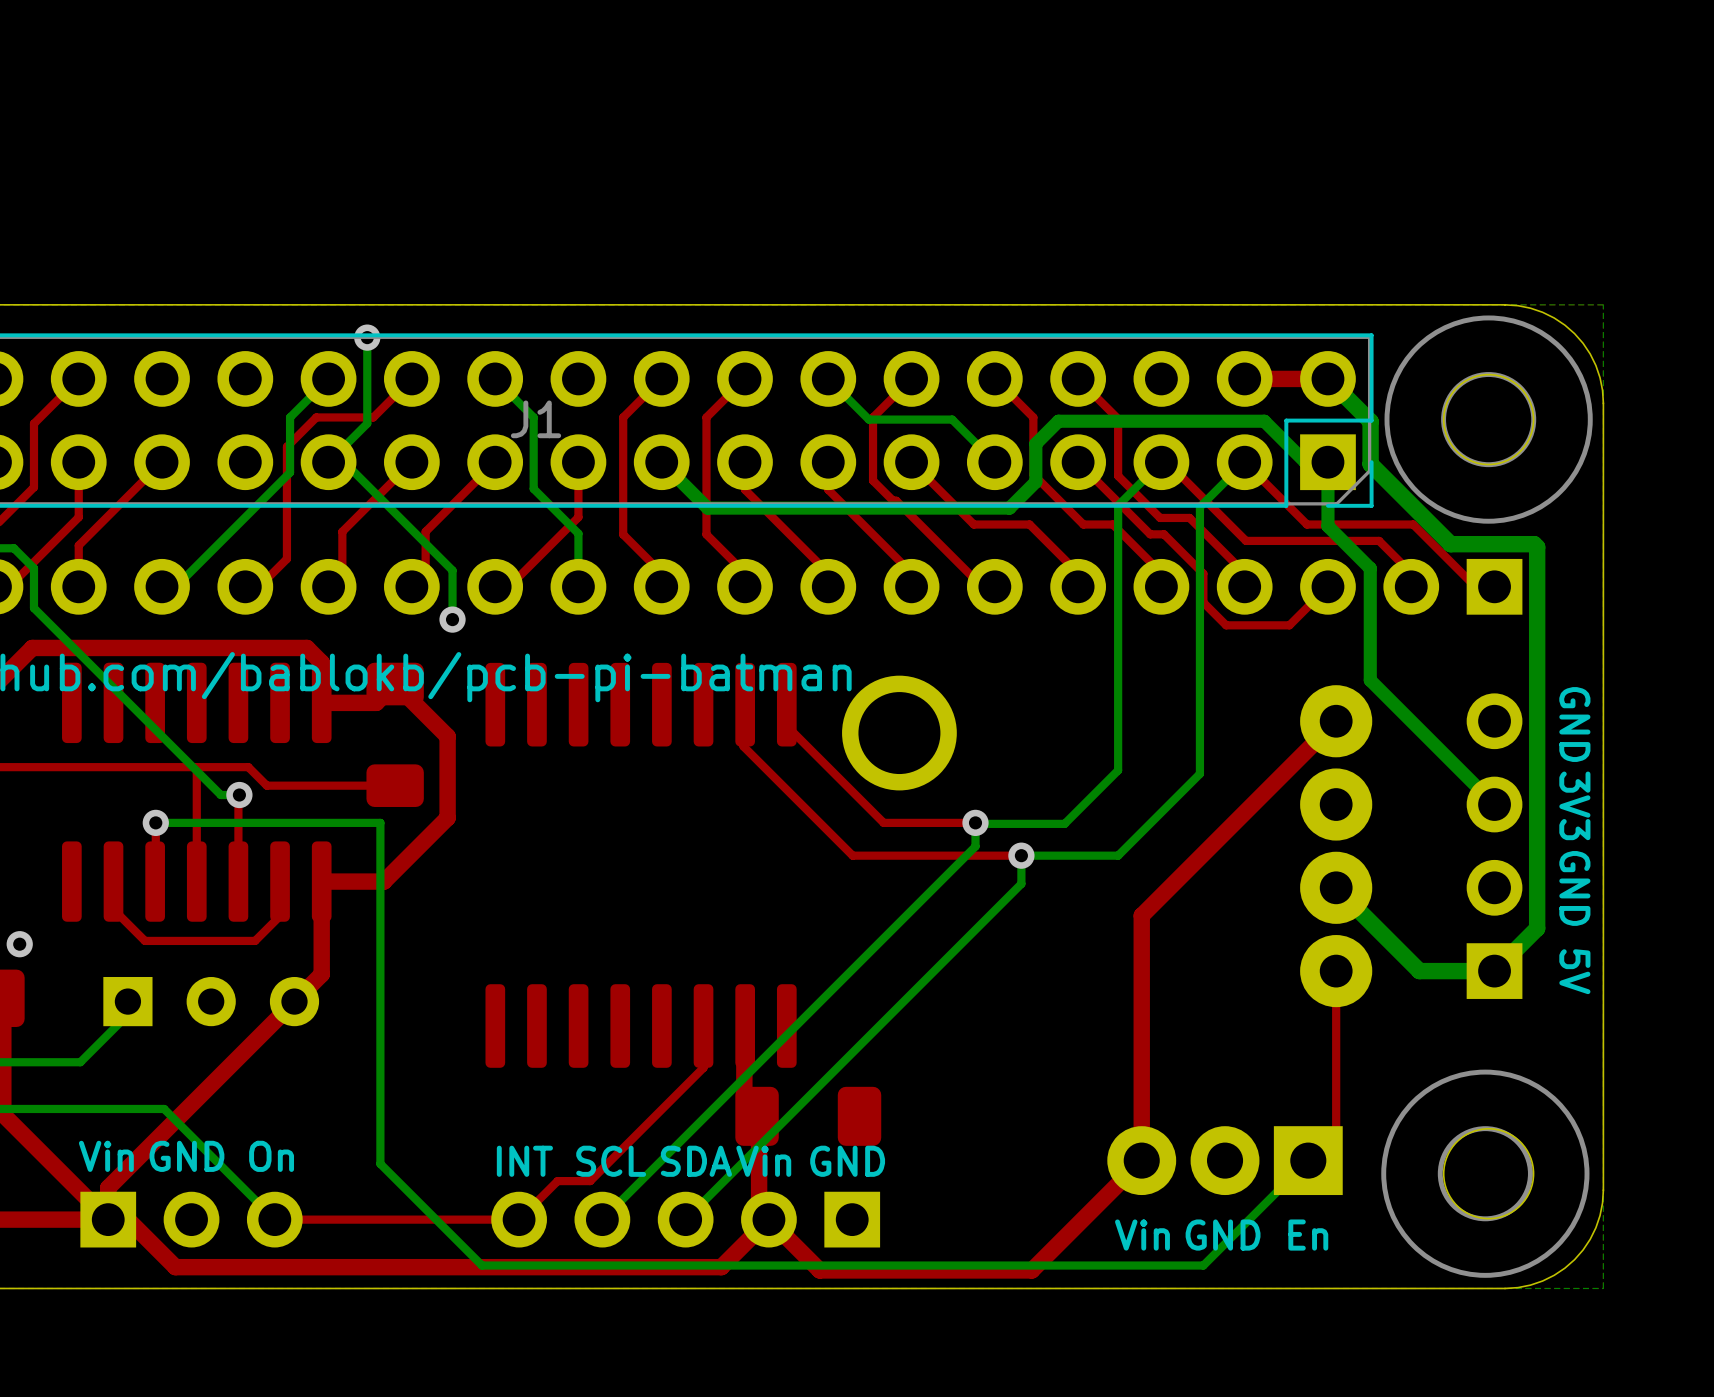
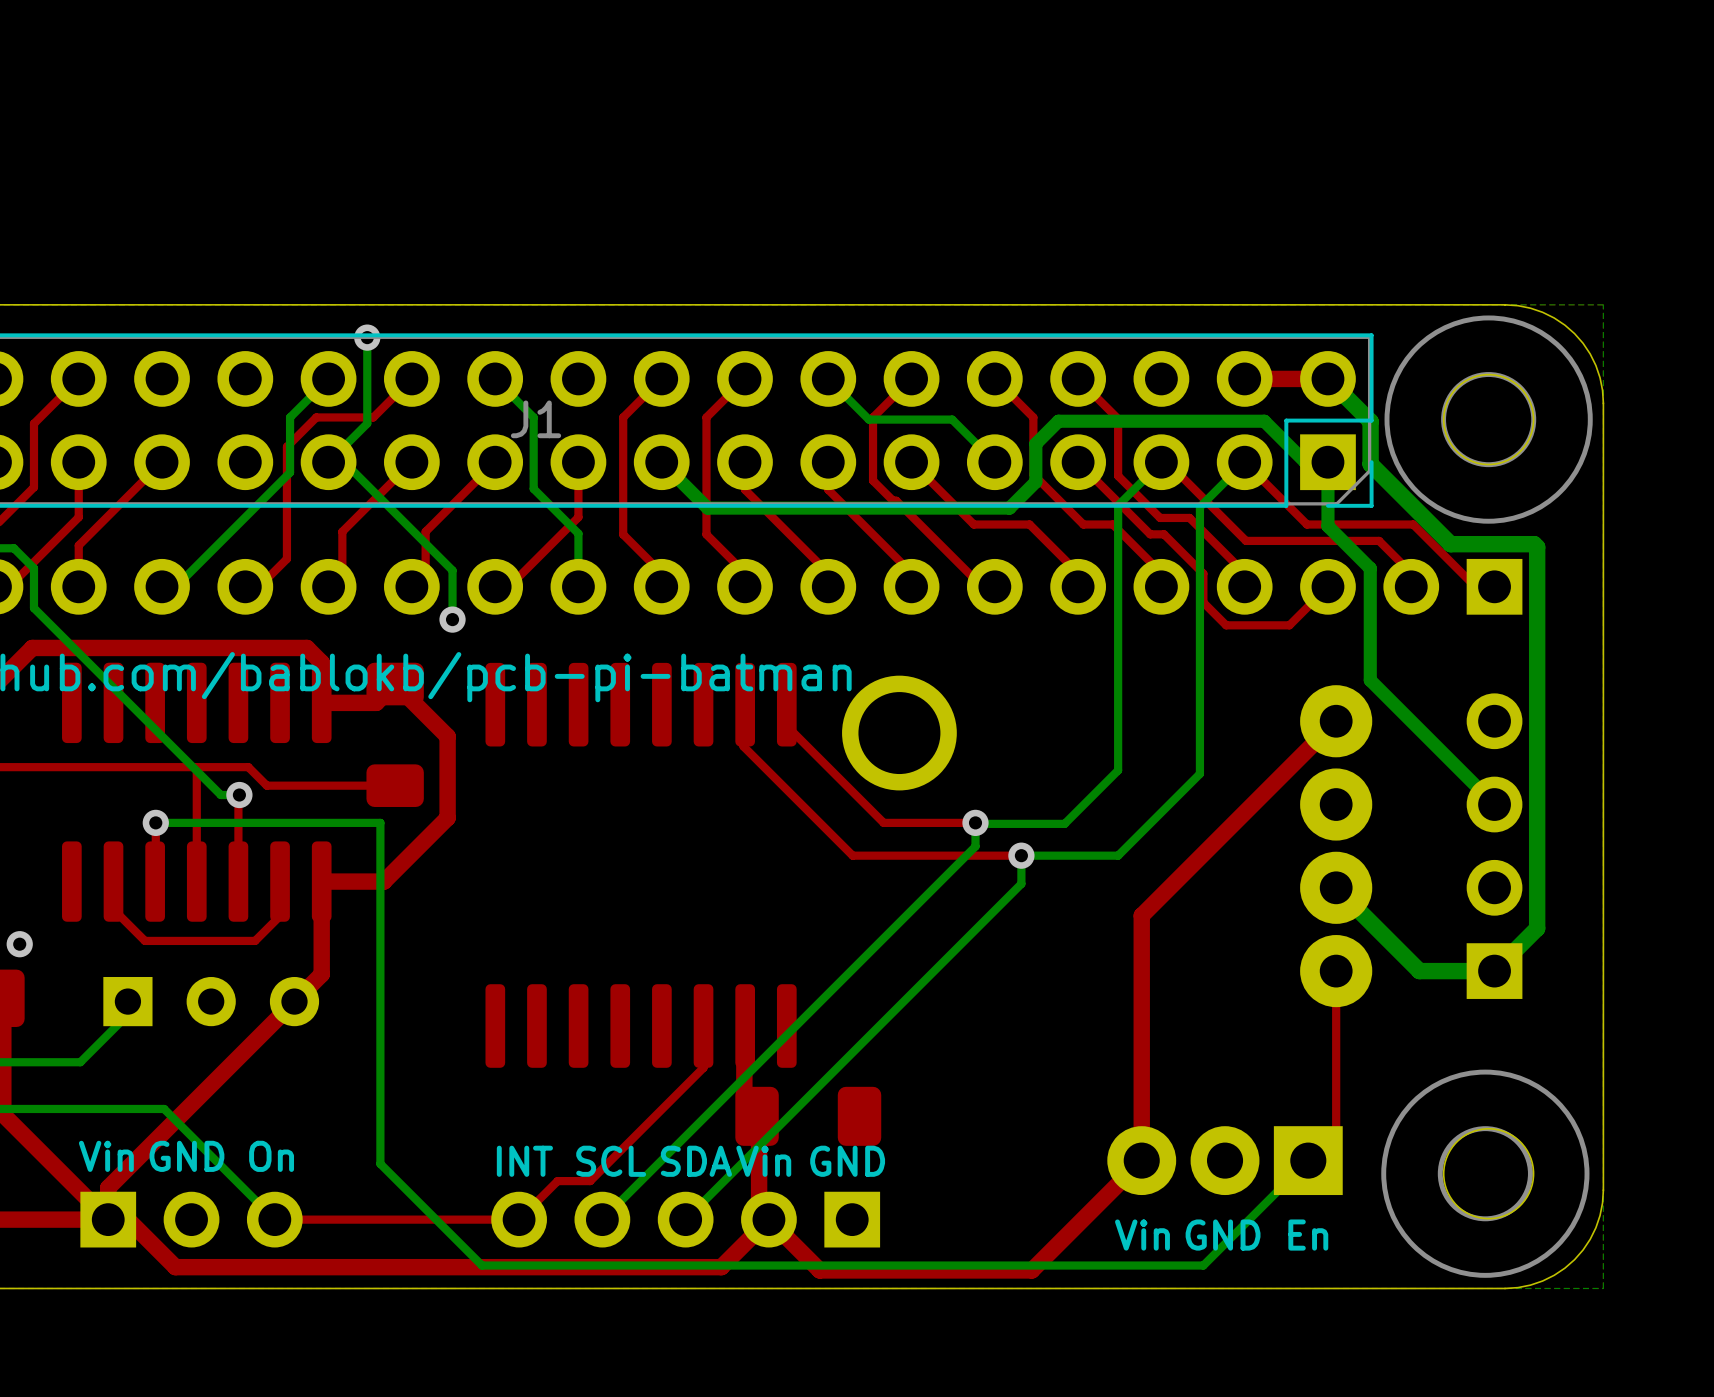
text: GND (1574, 724) -> none
text: 3V3 (1574, 805) -> none
text: GND (1574, 888) -> none
text: 5V (1574, 971) -> none

